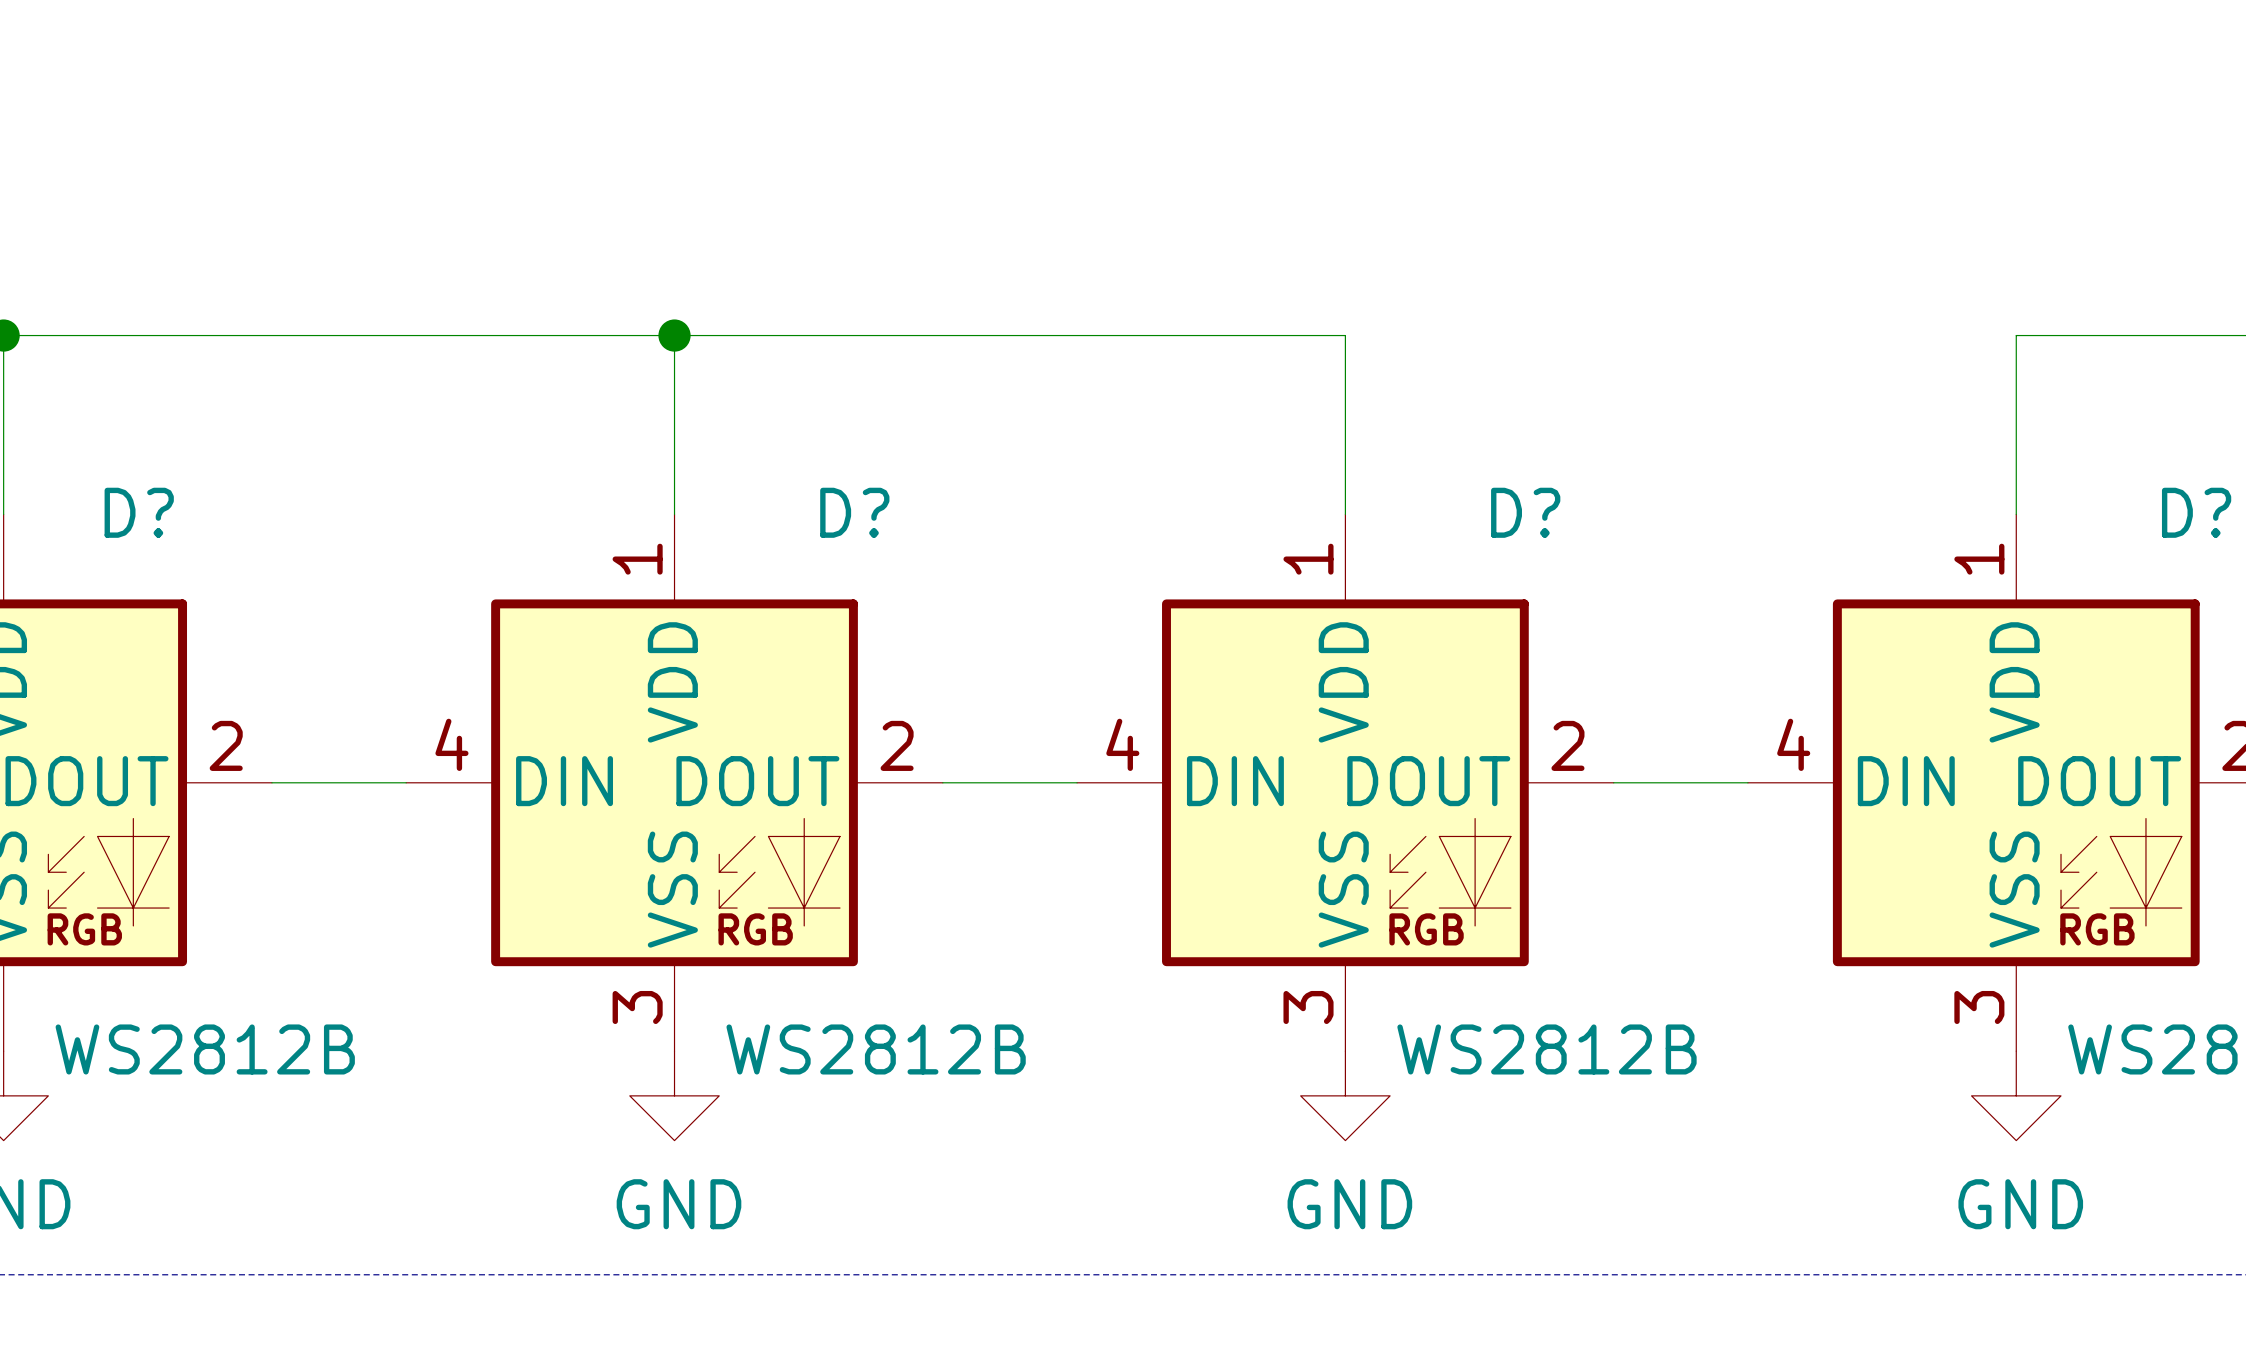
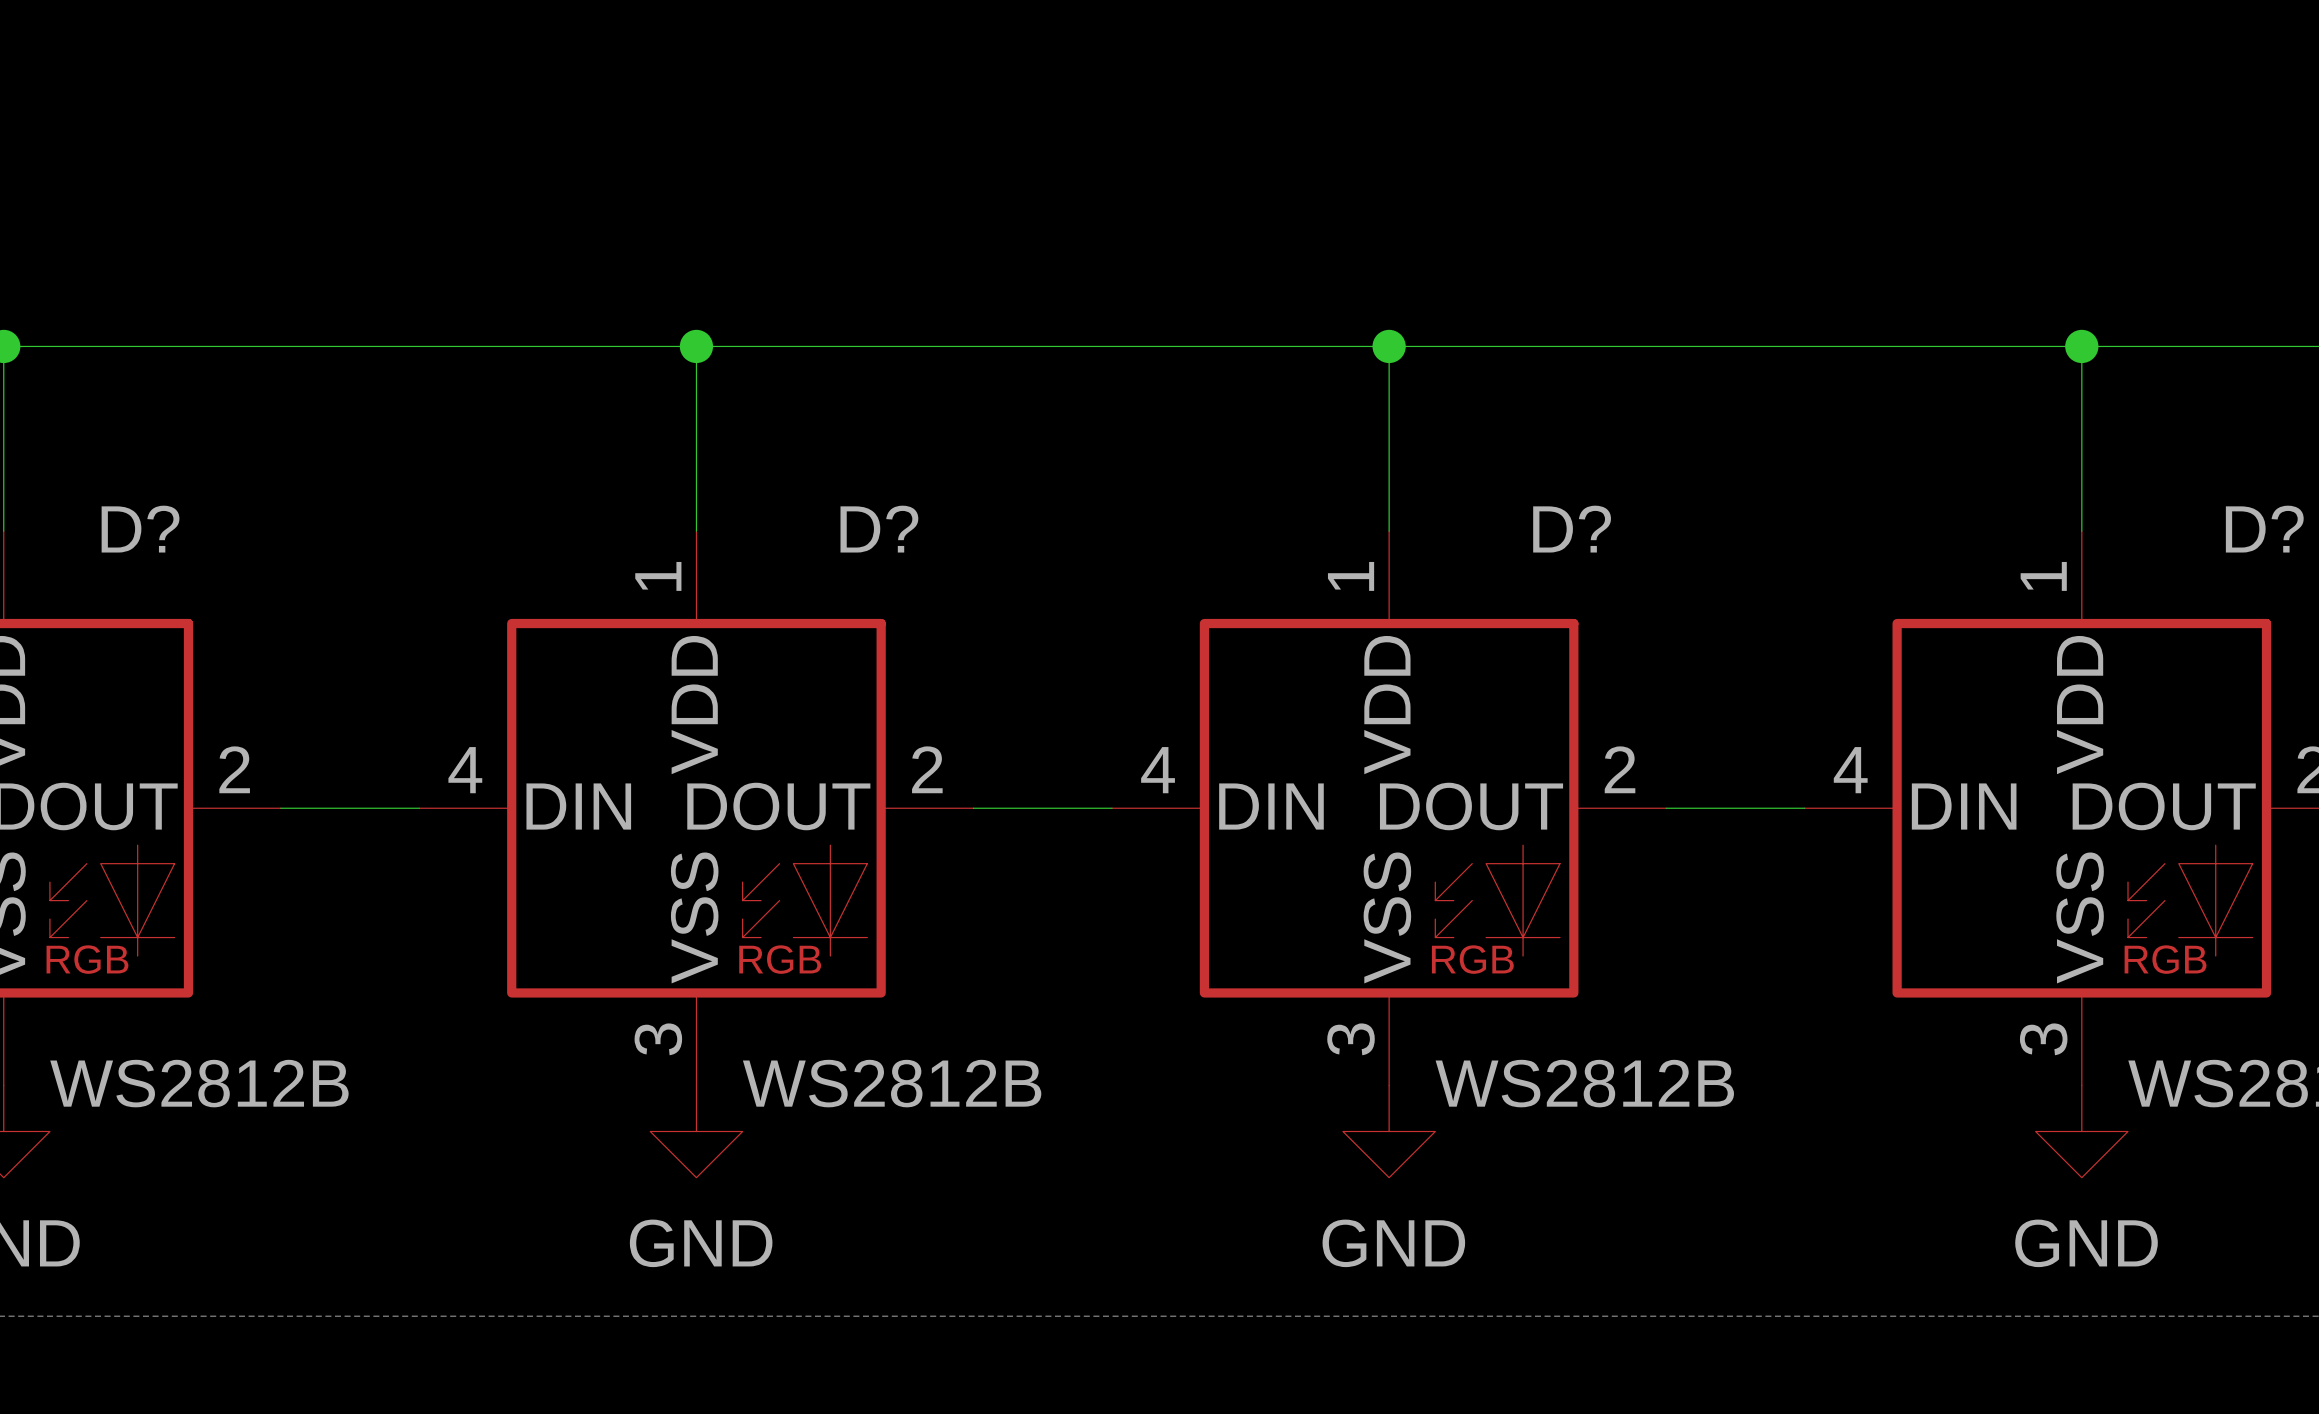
wire: none -> (1389, 346) (2081, 346)
junction: none -> (1389, 346)
junction: none -> (2081, 346)

